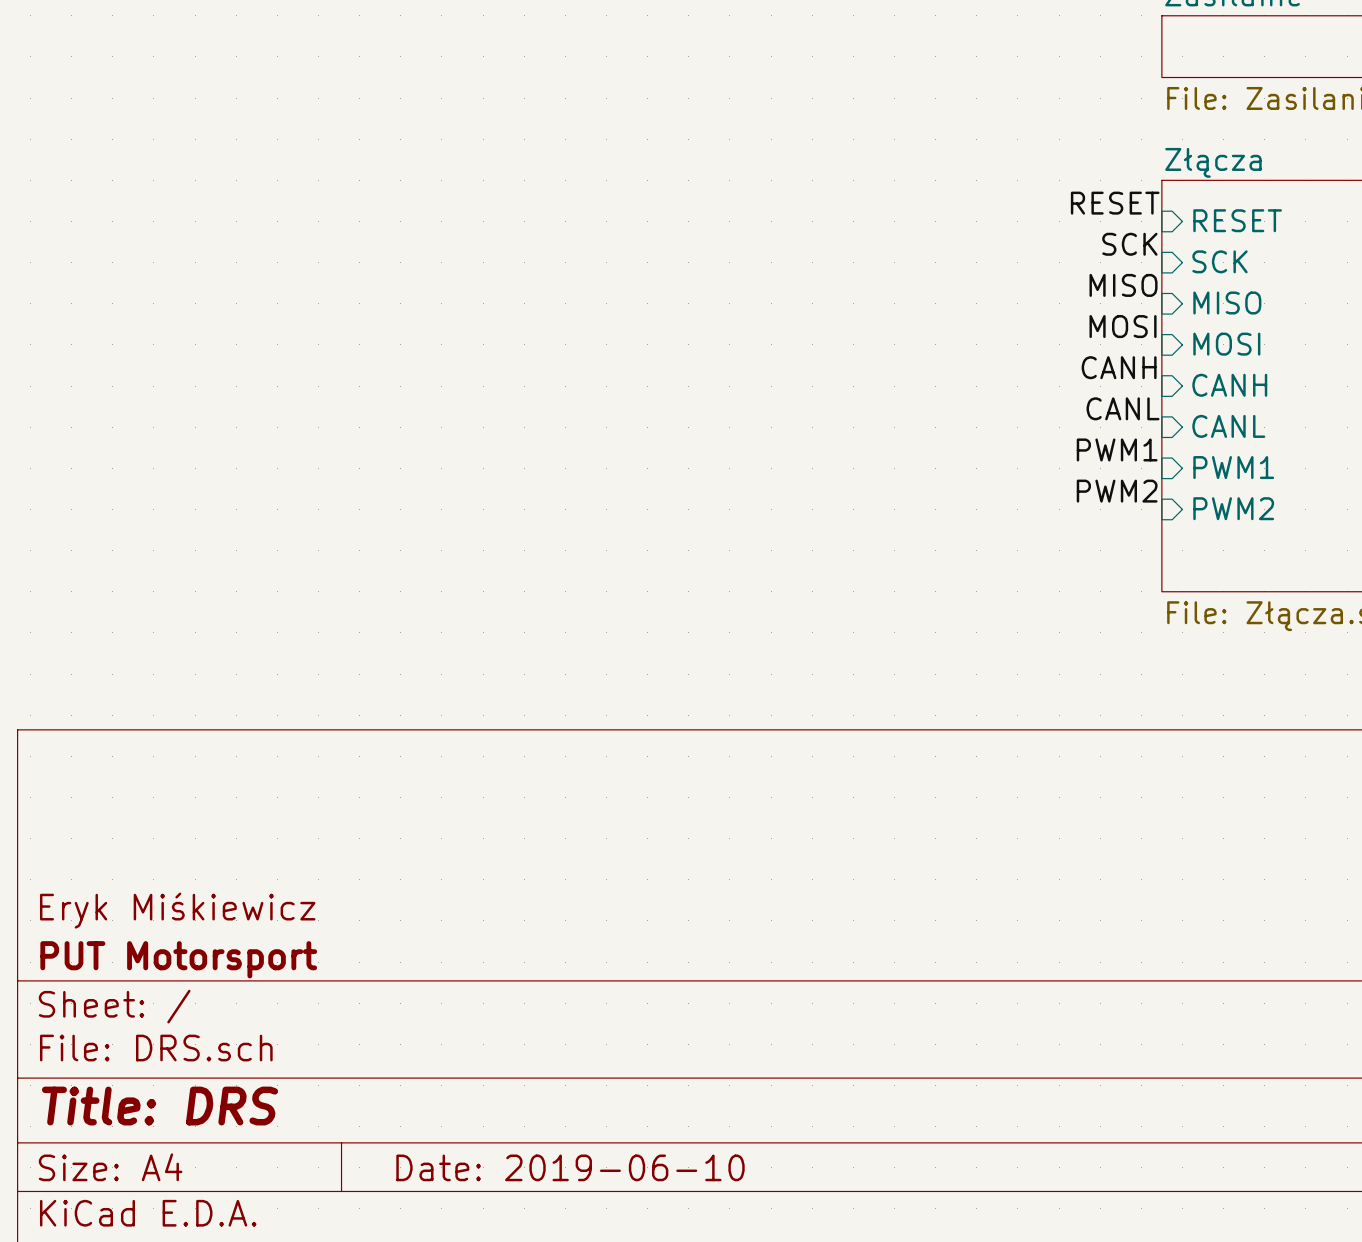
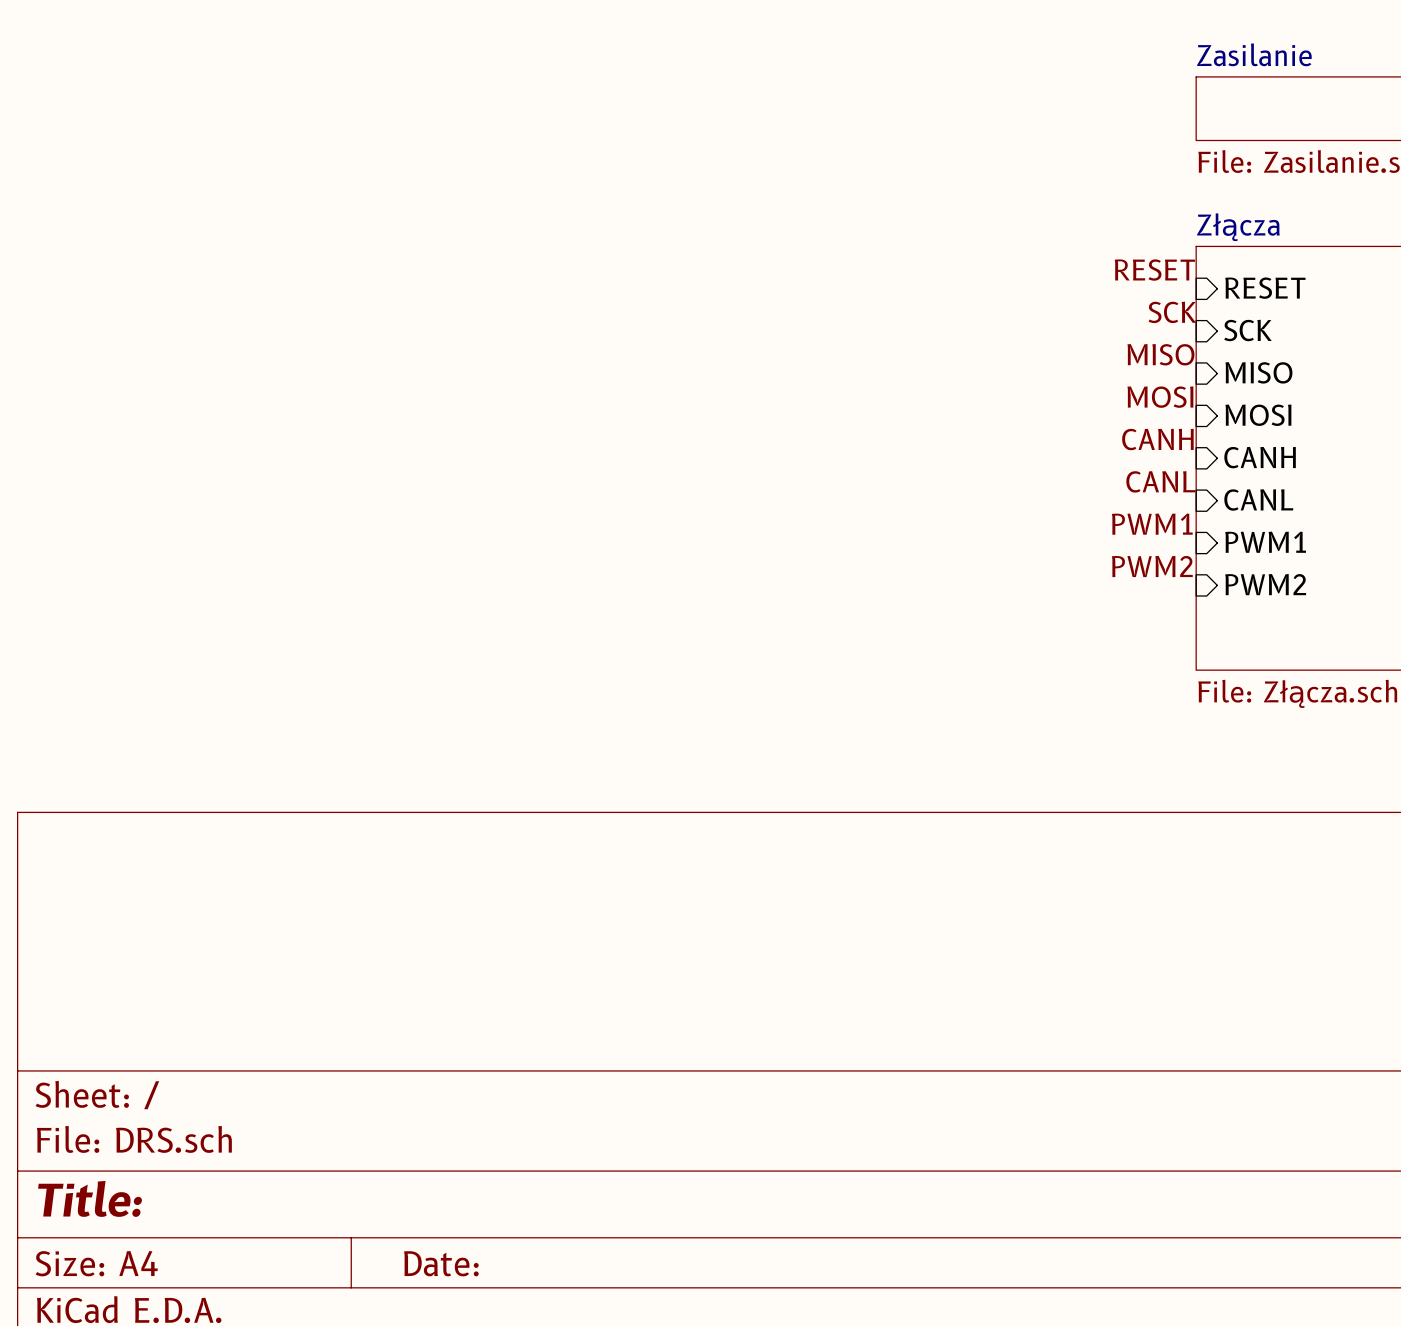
title block: Eryk Miśkiewicz (177, 910) -> none
title block: PUT Motorsport (178, 959) -> none
title block: Title: DRS (160, 1106) -> Title: (90, 1198)
title block: Date: 2019-06-10 (570, 1167) -> Date: (441, 1263)

